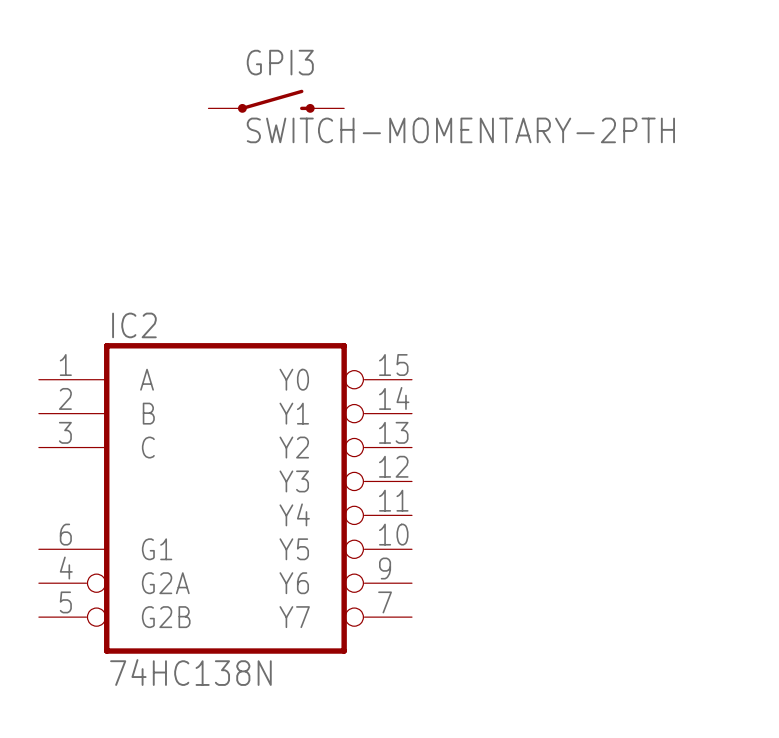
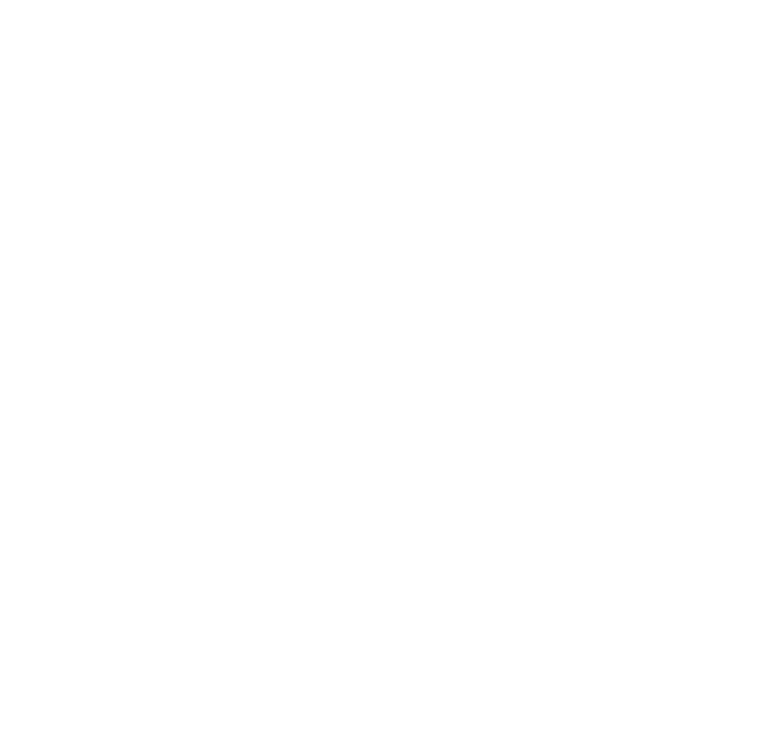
GPI3: SWITCH-MOMENTARY-2PTH (276, 101) -> none
IC2: 74HC138N (225, 498) -> none

